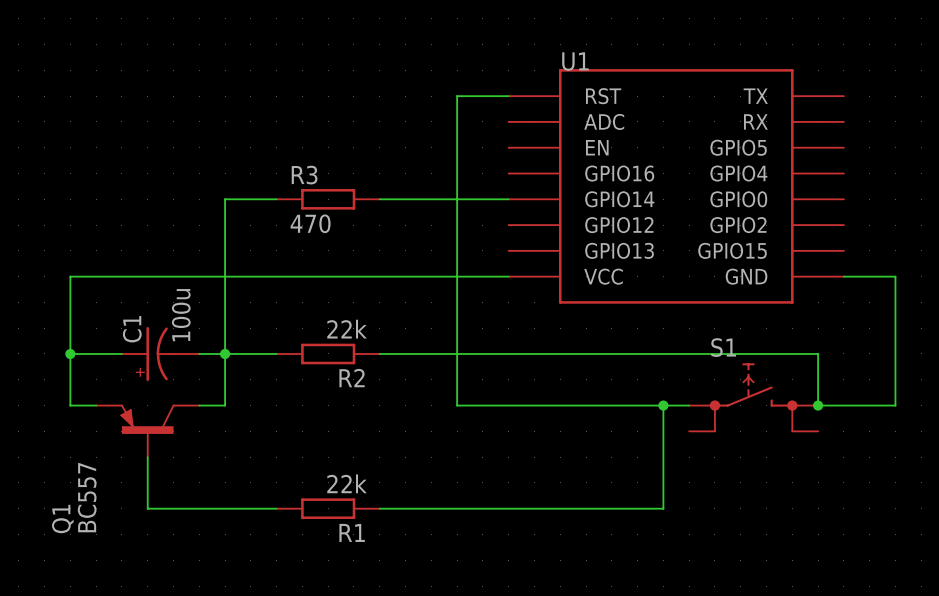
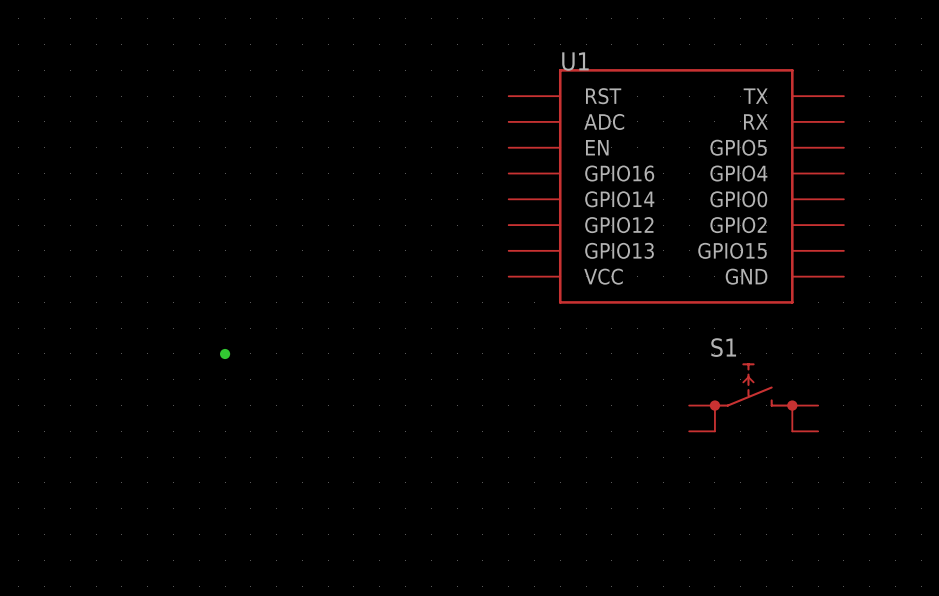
wire: (508, 96) (457, 96) (457, 405) (689, 405) -> none
wire: (276, 199) (225, 199) (225, 405) (199, 405) -> none
R3: 470 (328, 199) -> none
wire: (379, 199) (508, 199) -> none
wire: (508, 276) (70, 276) (70, 405) (96, 405) -> none
wire: (843, 276) (895, 276) (895, 405) (818, 405) (818, 353) (379, 353) -> none
wire: (70, 353) (121, 353) -> none
junction: (70, 353) -> none
C1: 100u (160, 353) -> none
wire: (199, 353) (276, 353) -> none
R2: 22k (328, 353) -> none
wire: (663, 405) (663, 508) (379, 508) -> none
junction: (663, 405) -> none
junction: (818, 405) -> none
Q1: BC557 (147, 430) -> none
wire: (147, 457) (147, 508) (276, 508) -> none
R1: 22k (328, 508) -> none

